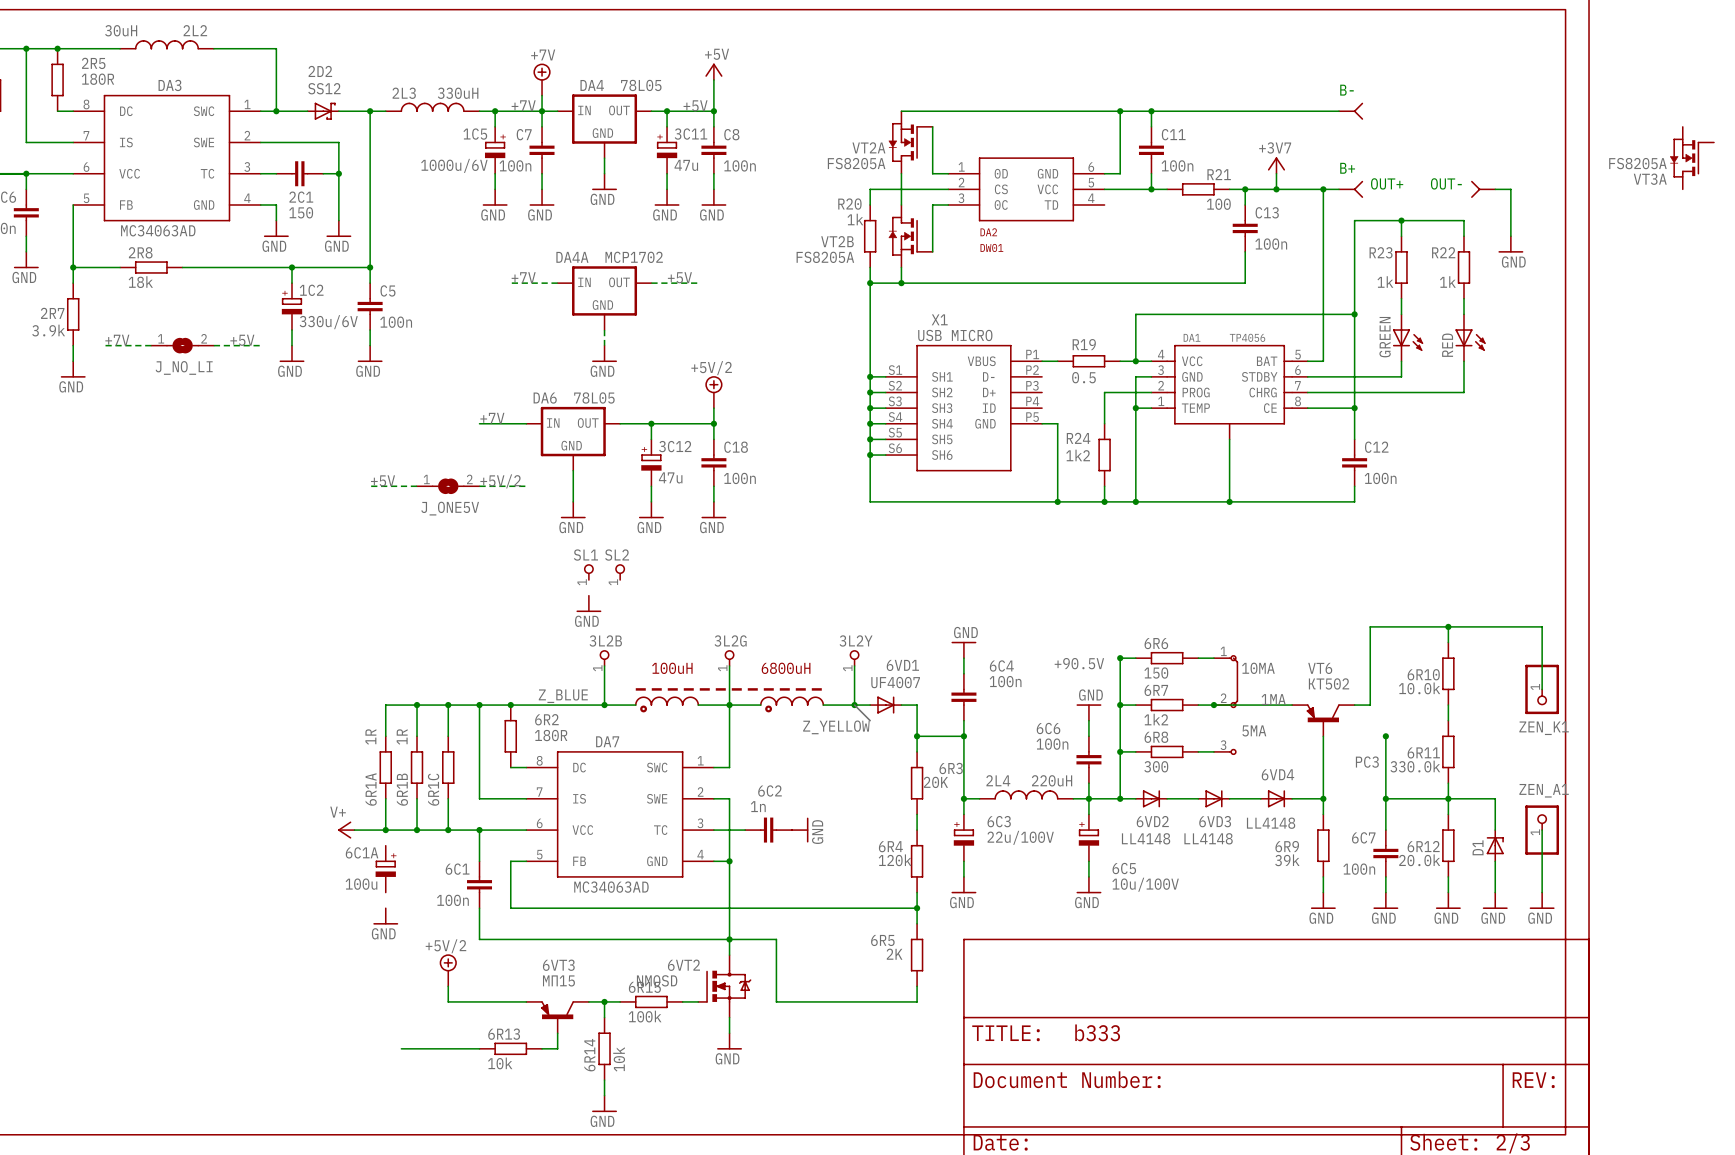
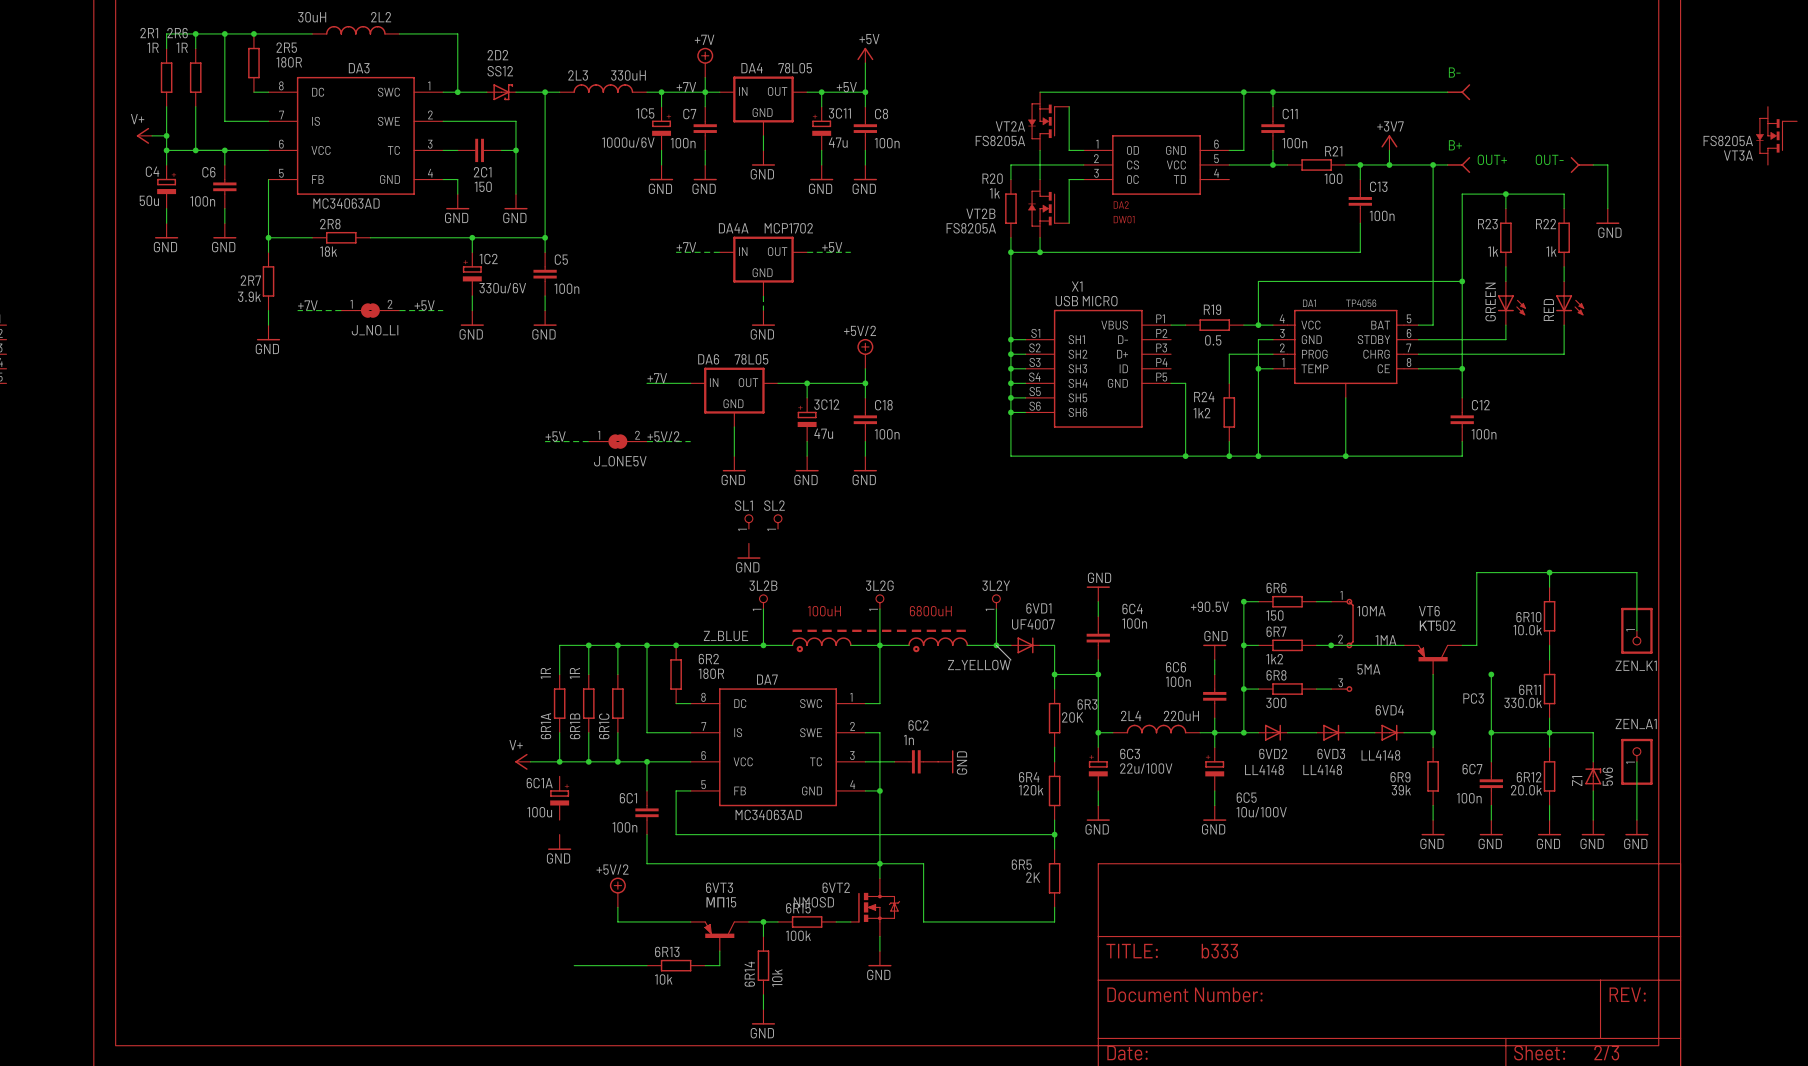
D1 value: none -> 5v6 (1607, 776)
D1 name: D1 (1478, 847) -> Z1 (1577, 781)

